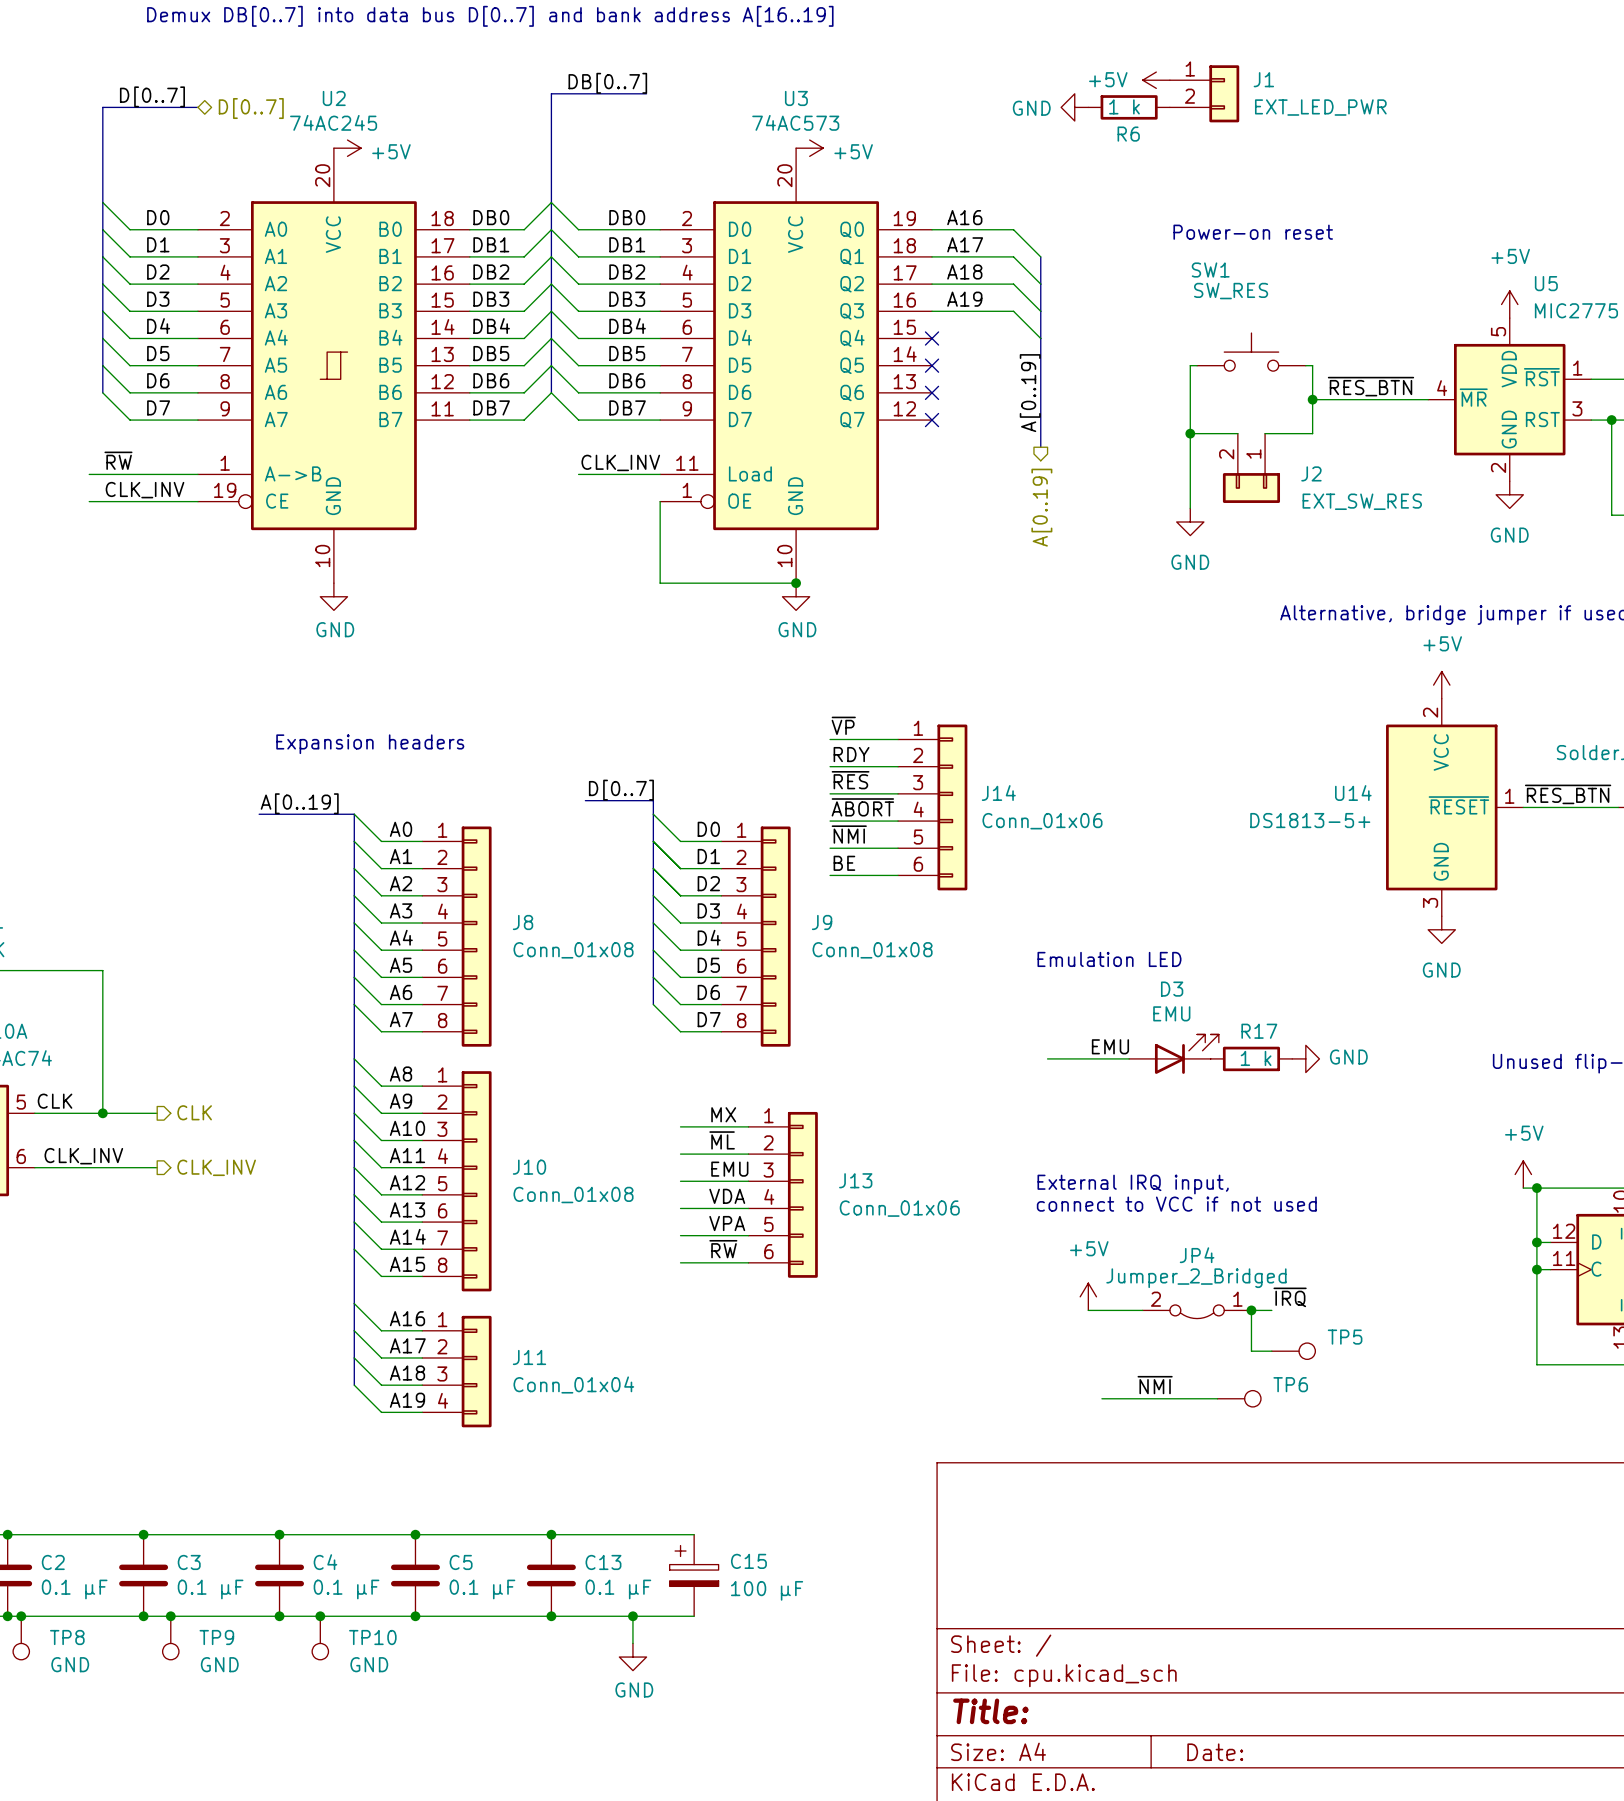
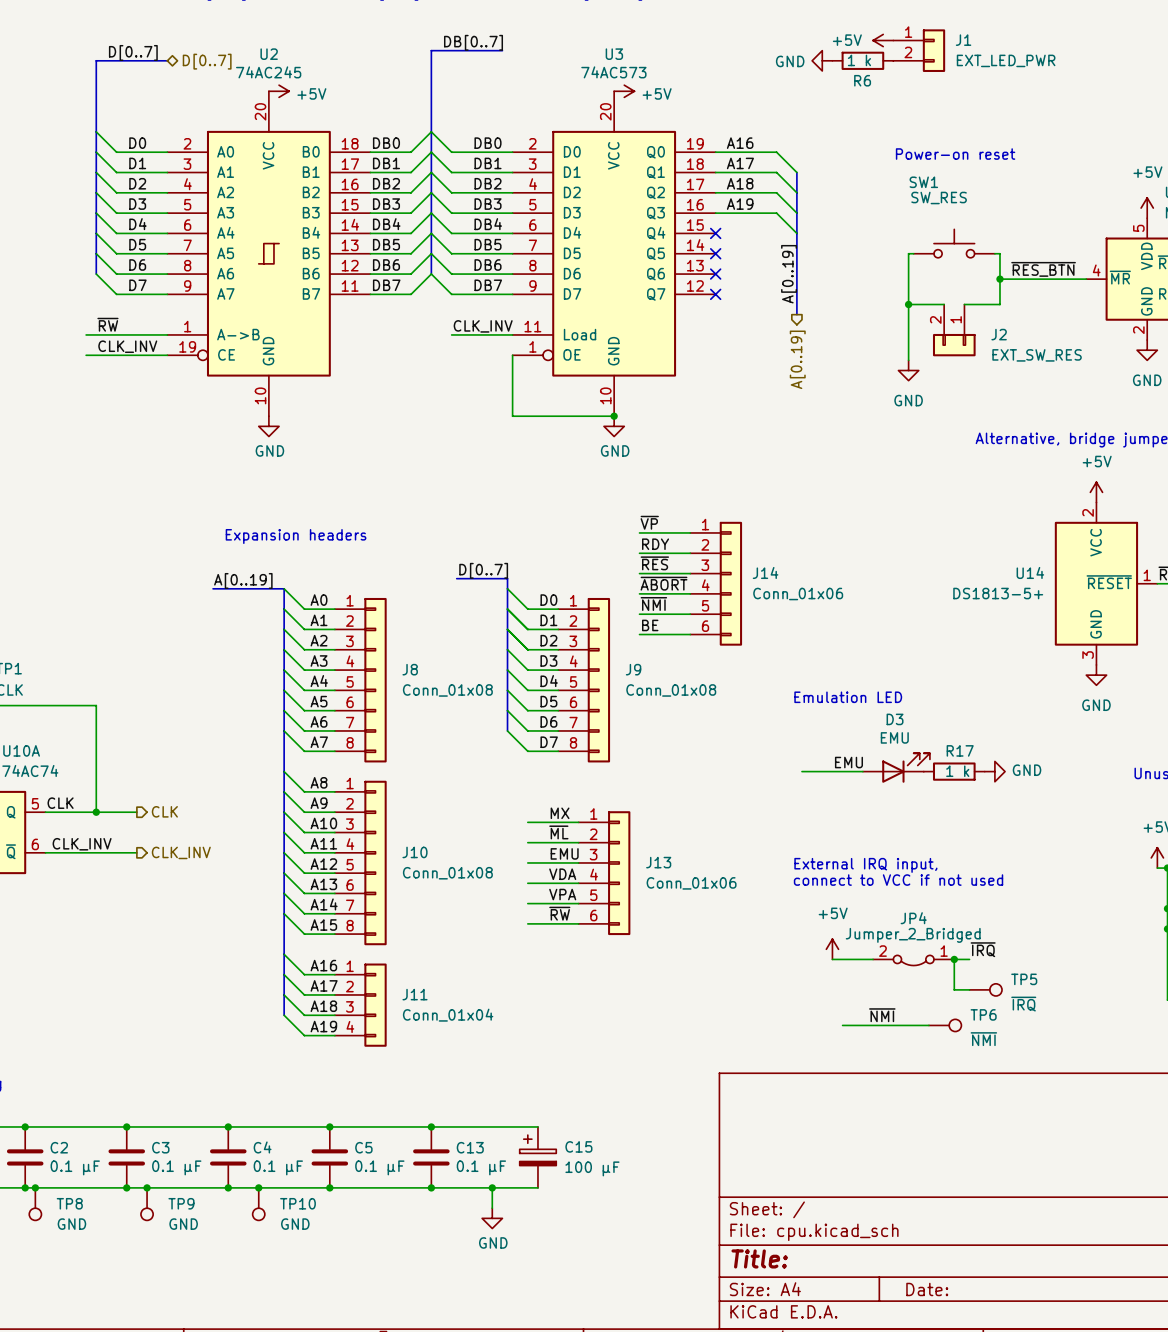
TP5 value: none -> ~{IRQ} (1023, 1004)
TP6 value: none -> ~{NMI} (983, 1039)

